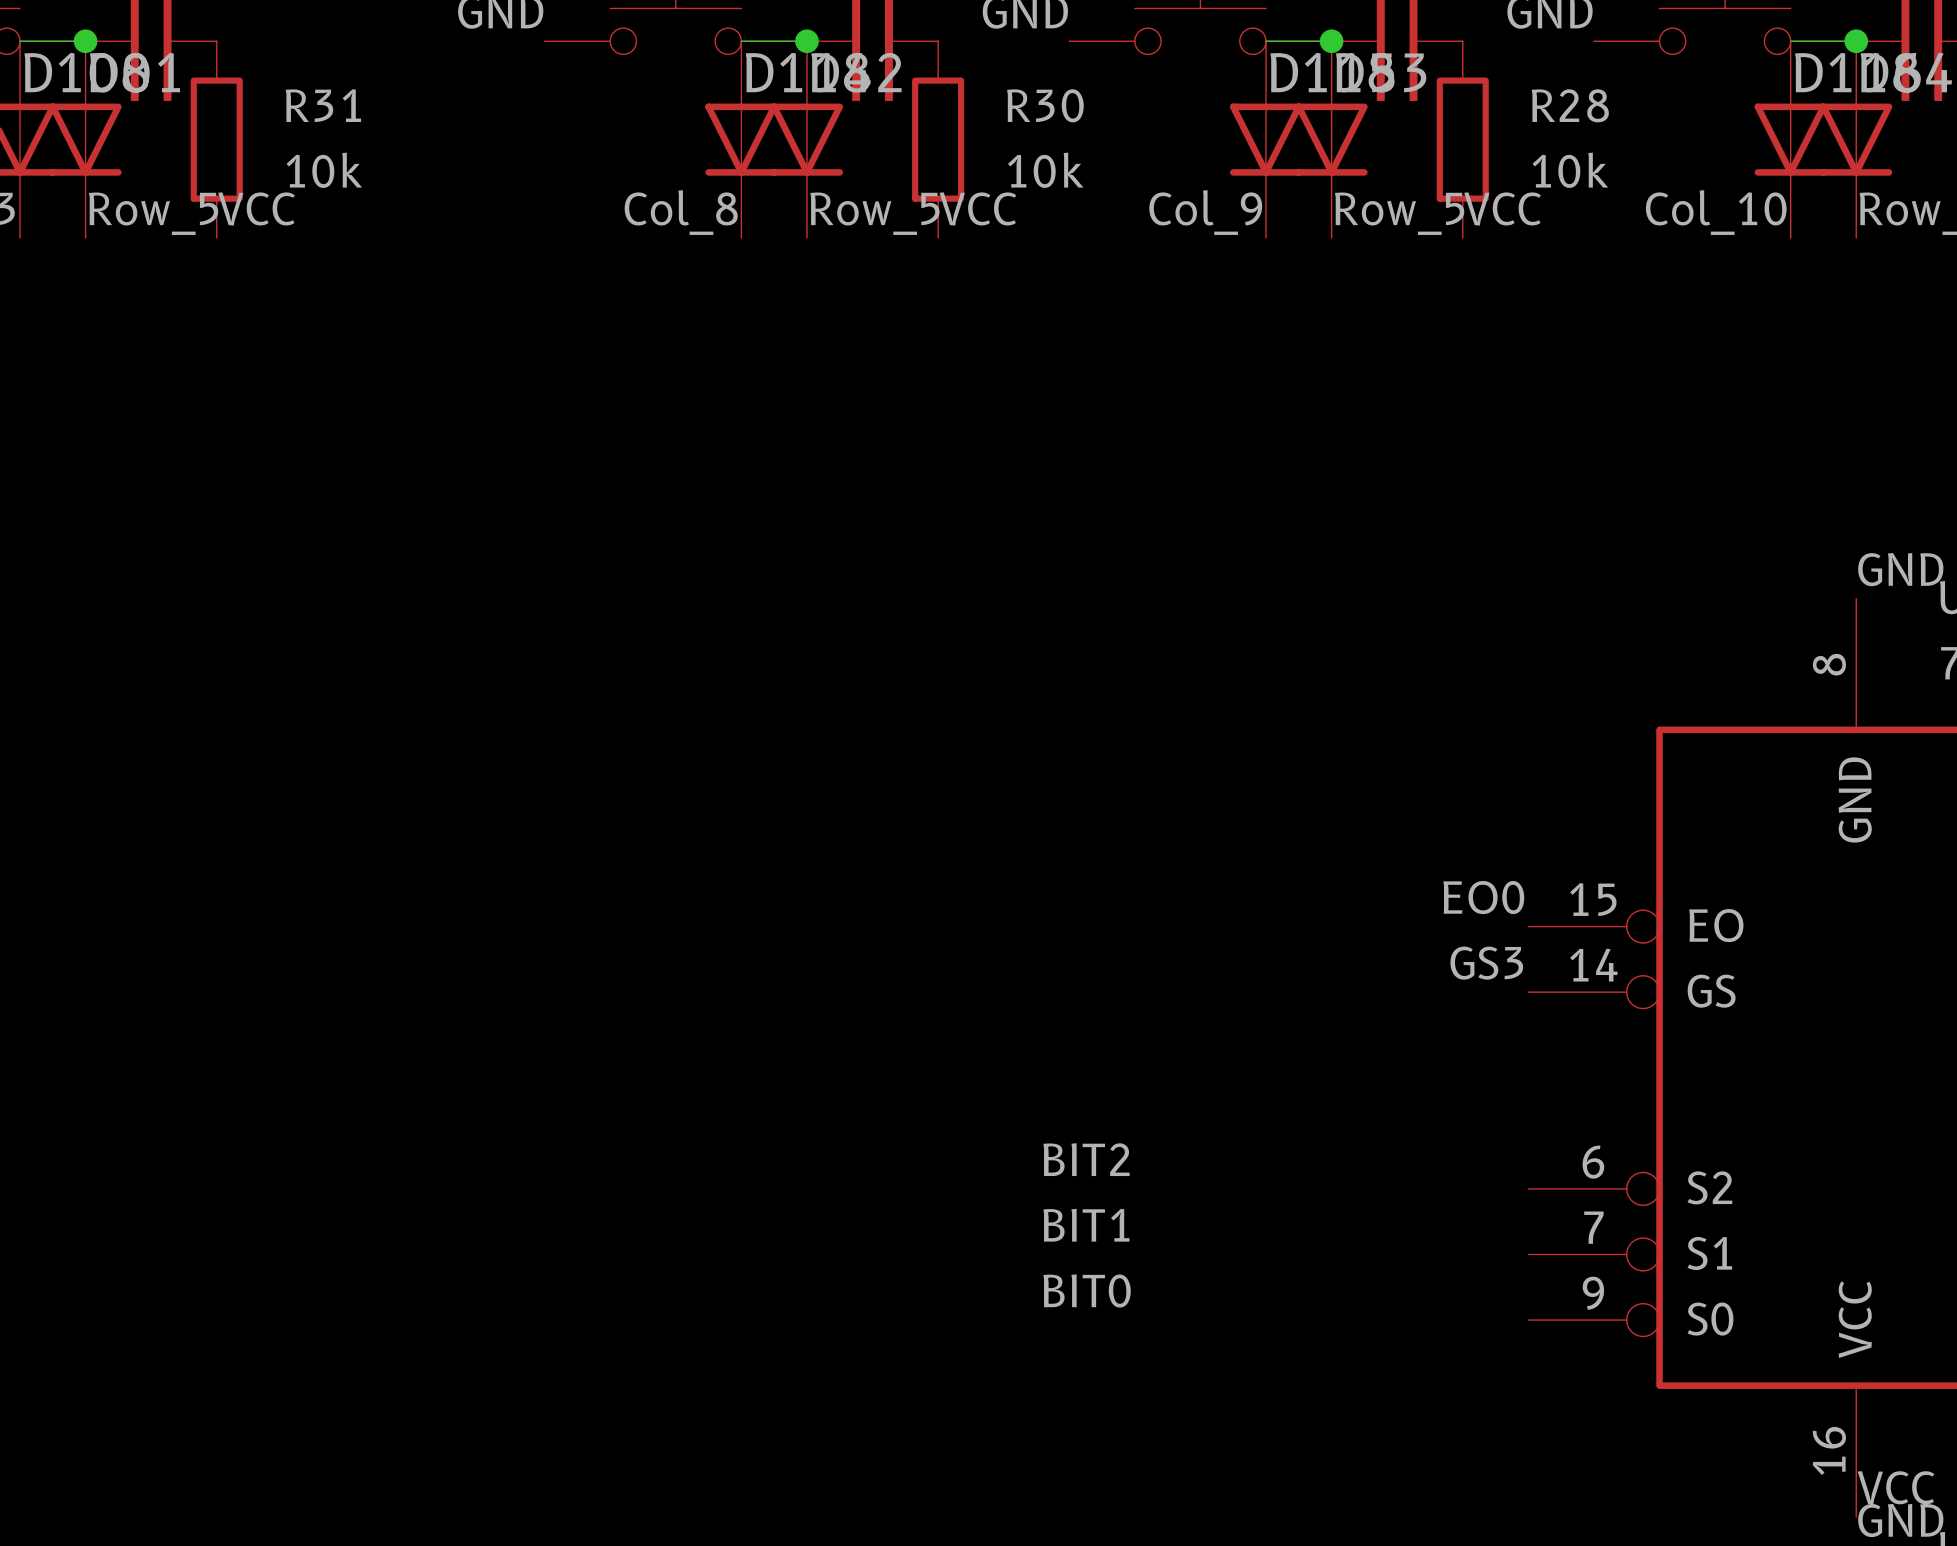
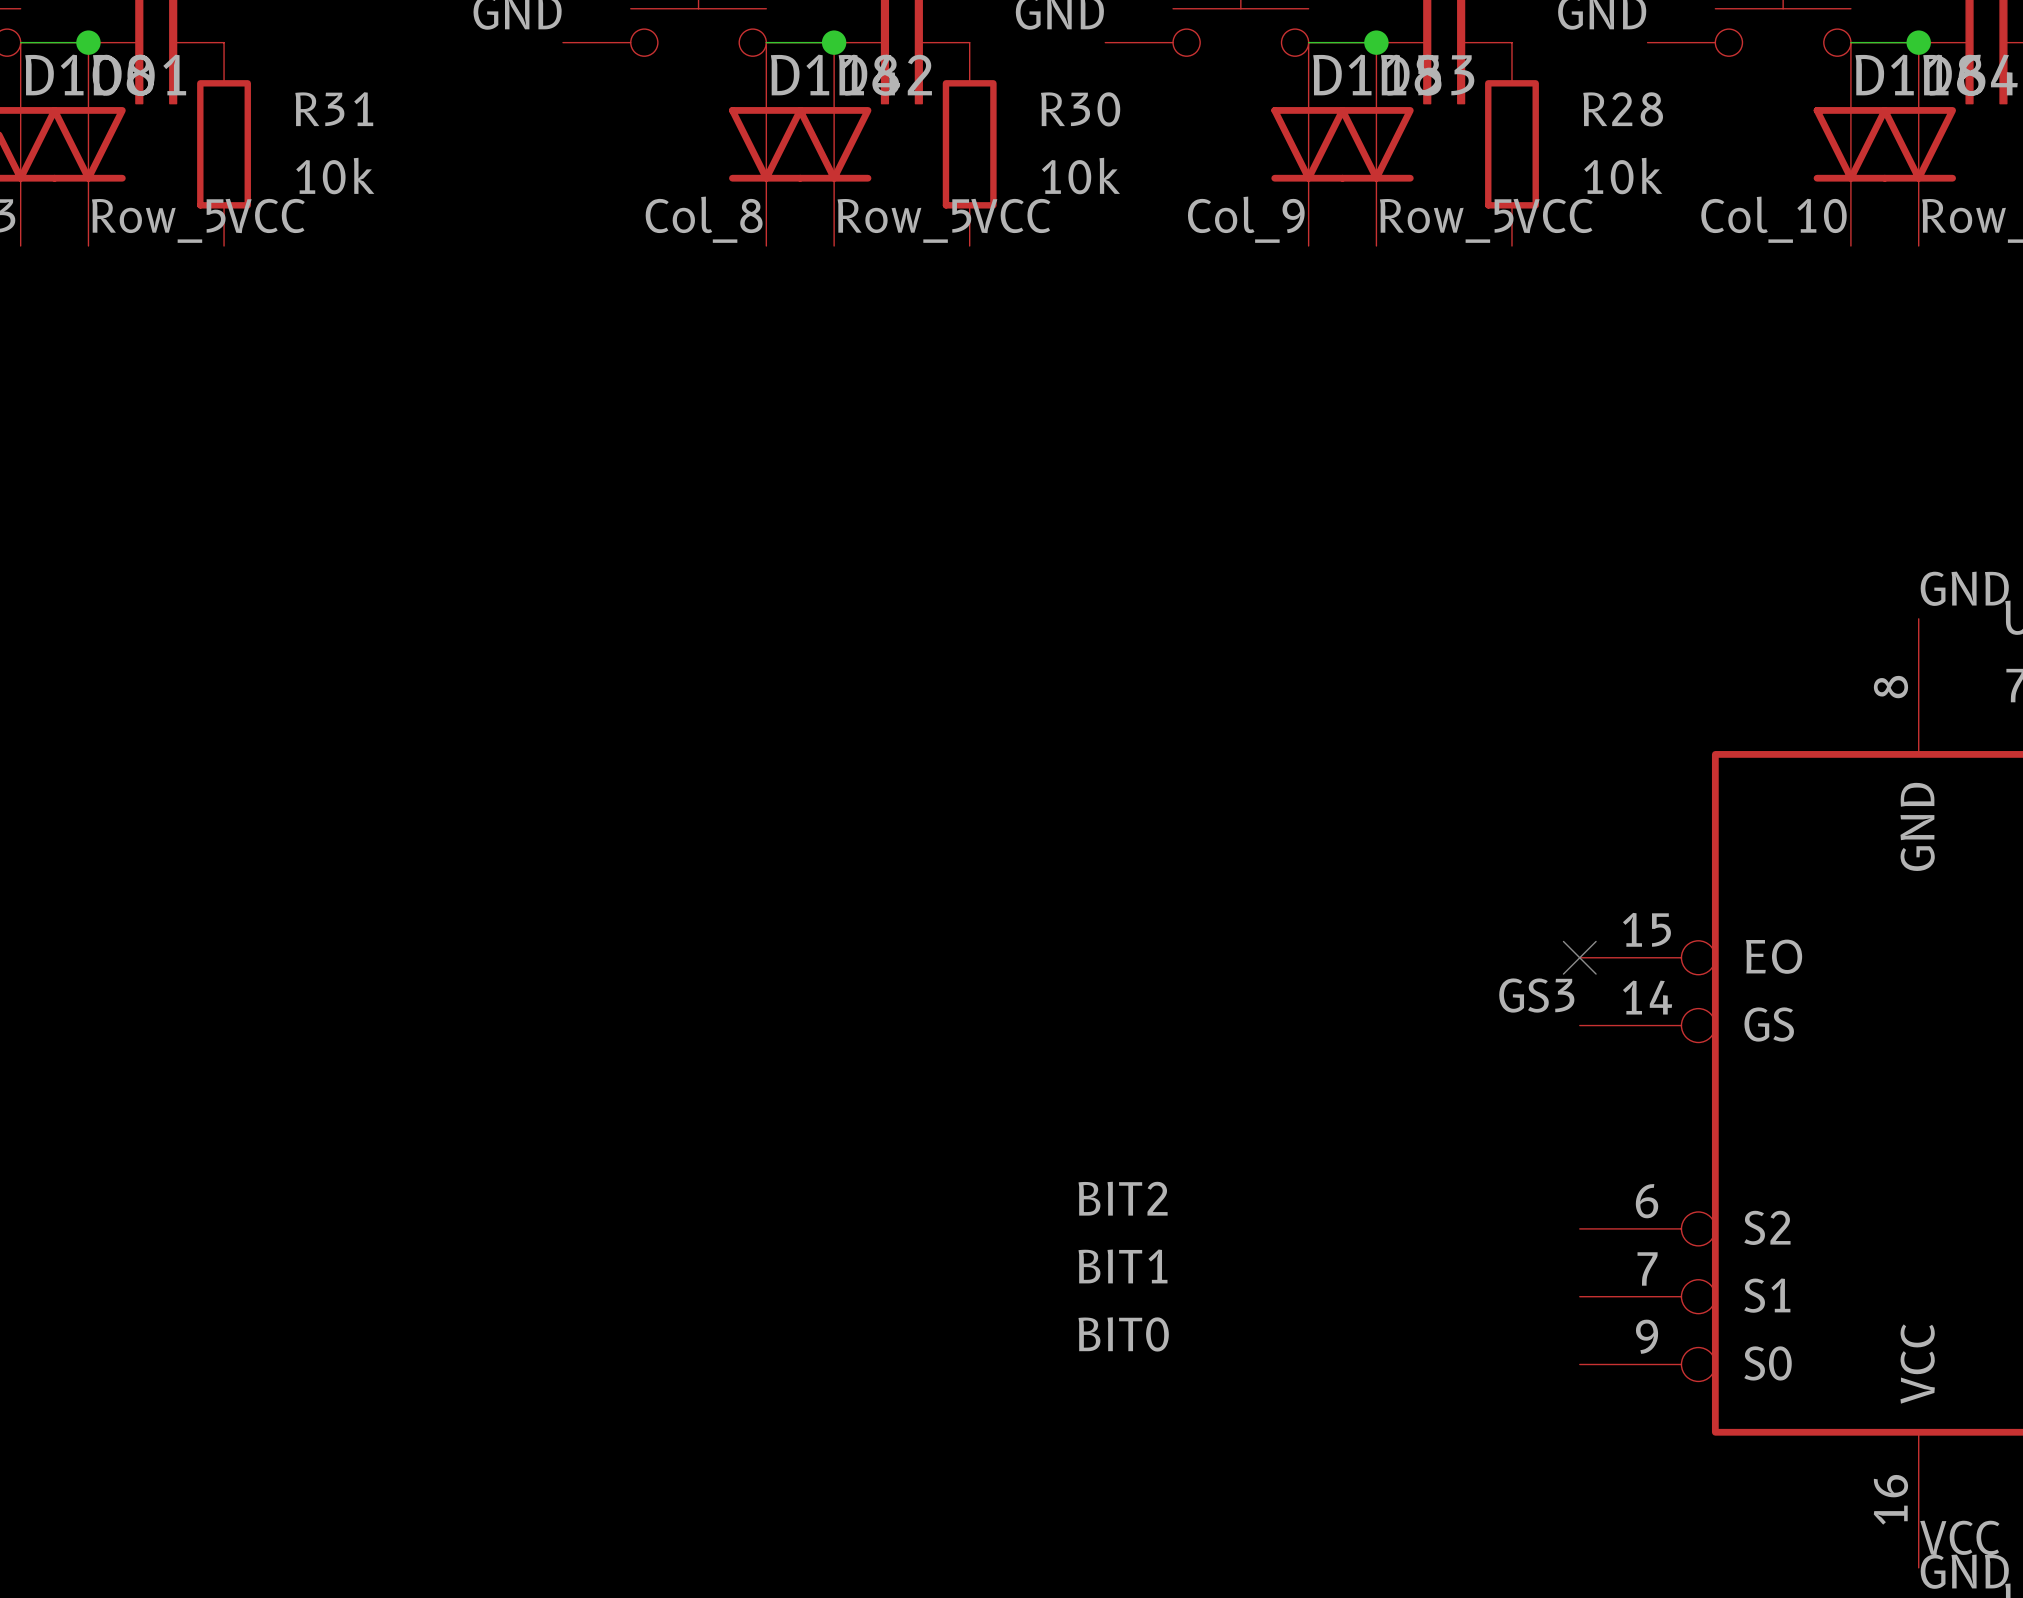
label: EO0 (1483, 897) -> none
no-connect mark: none -> (1579, 957)

